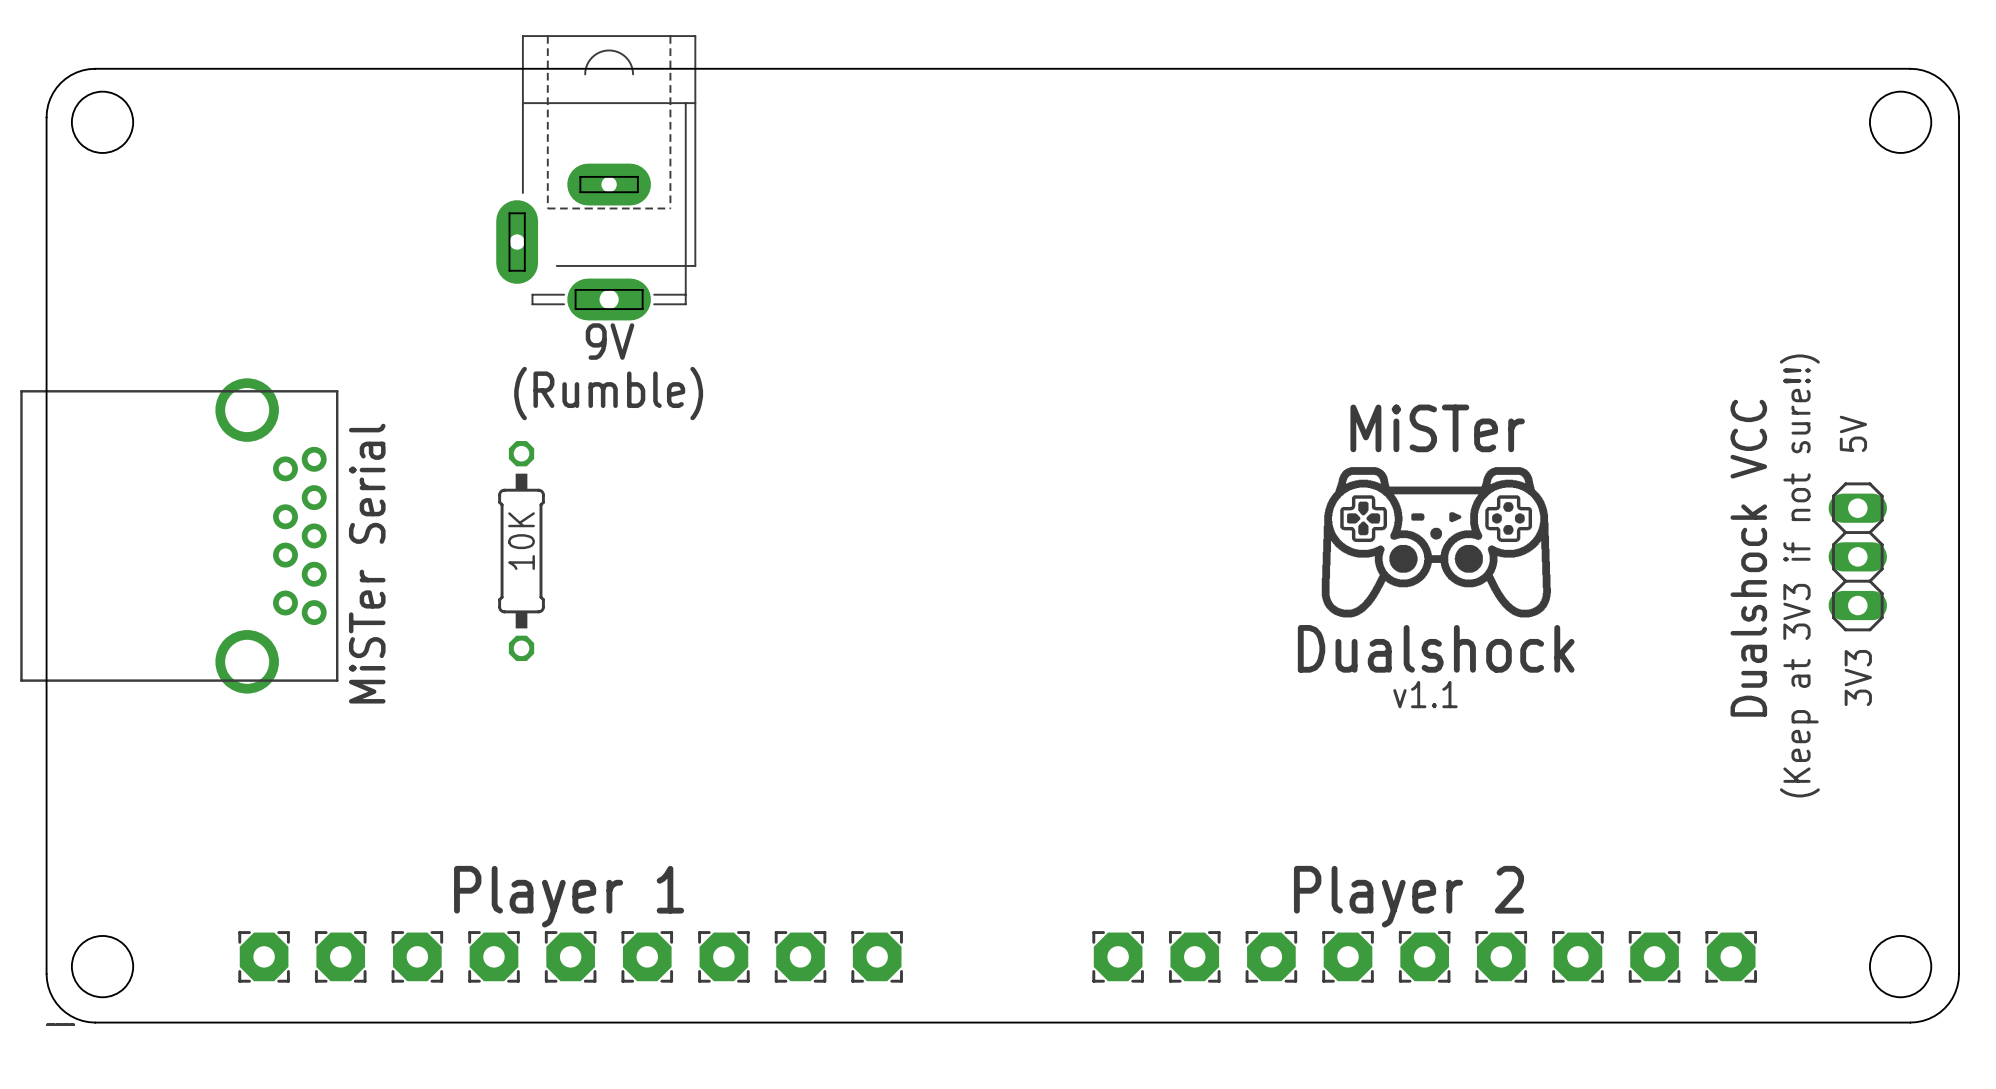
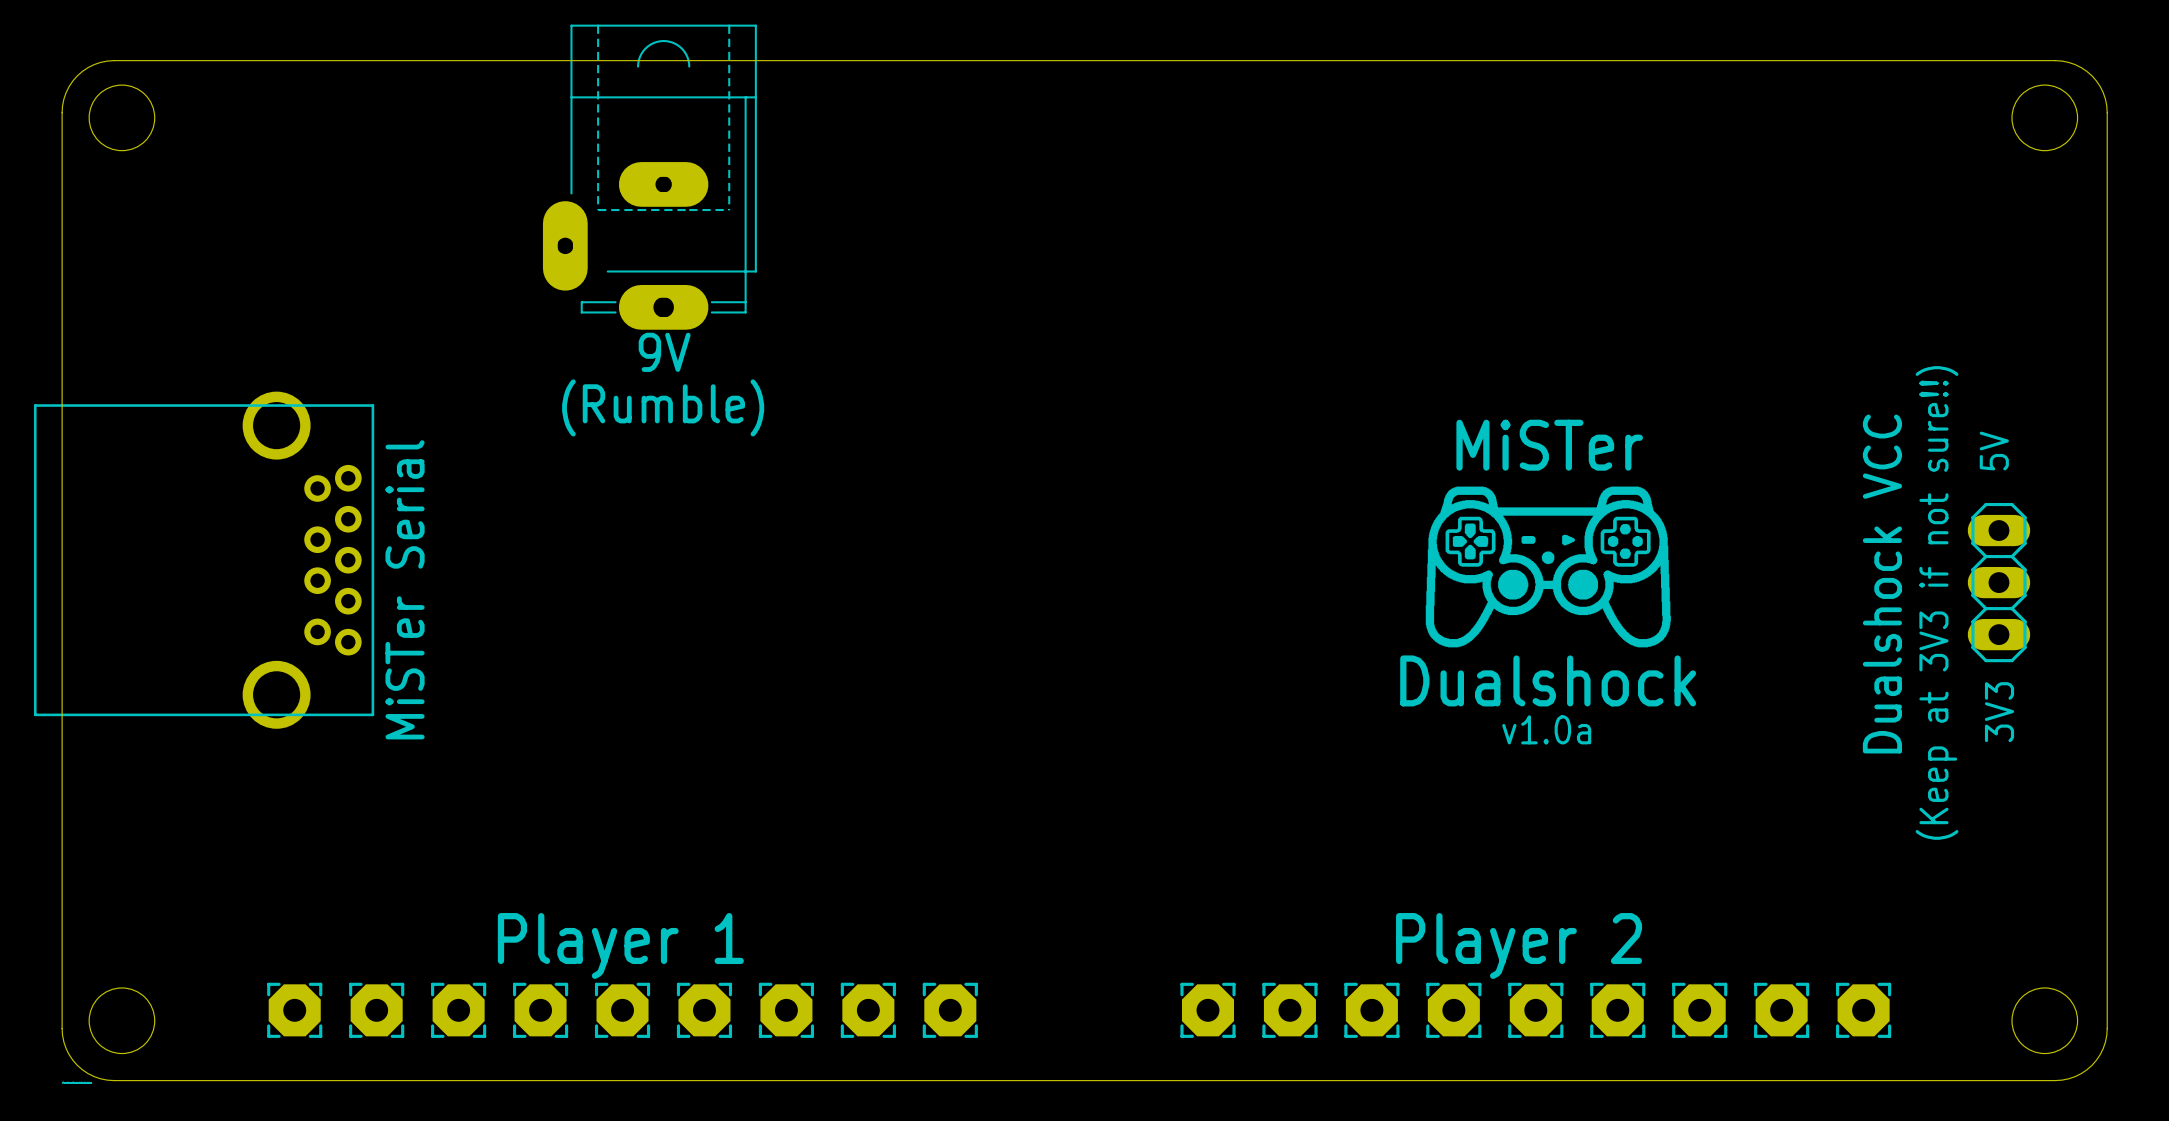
part: 10K (521, 551) -> none
text: v1.1 (1425, 694) -> v1.0a (1546, 729)

